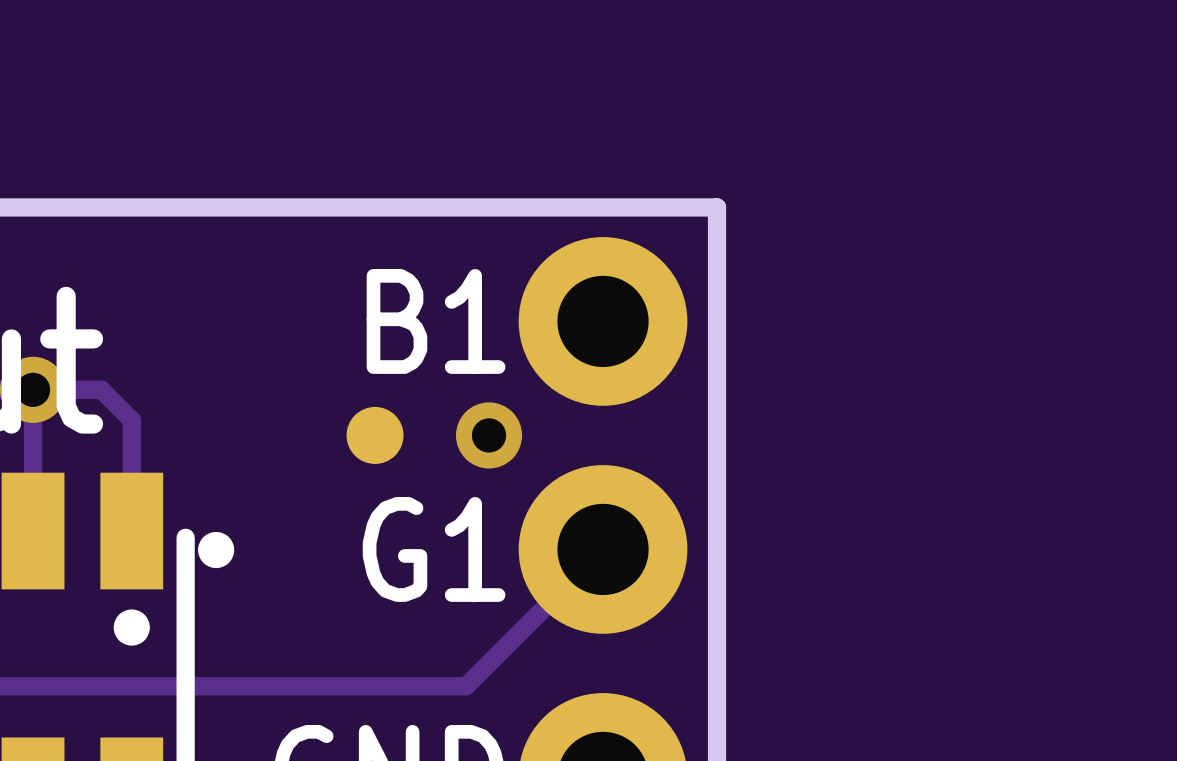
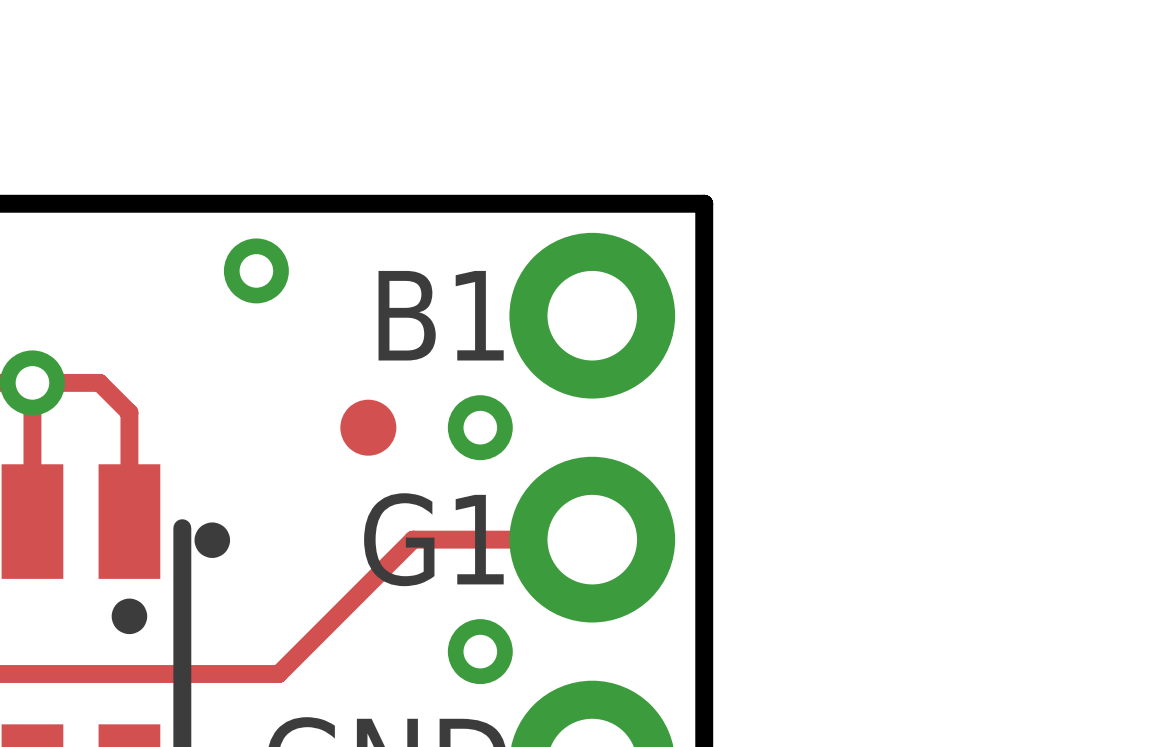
via: none -> (256, 270)
track: (603, 549) (466, 686) (283, 686) -> (592, 539) (413, 539) (278, 674)
via: none -> (480, 651)

